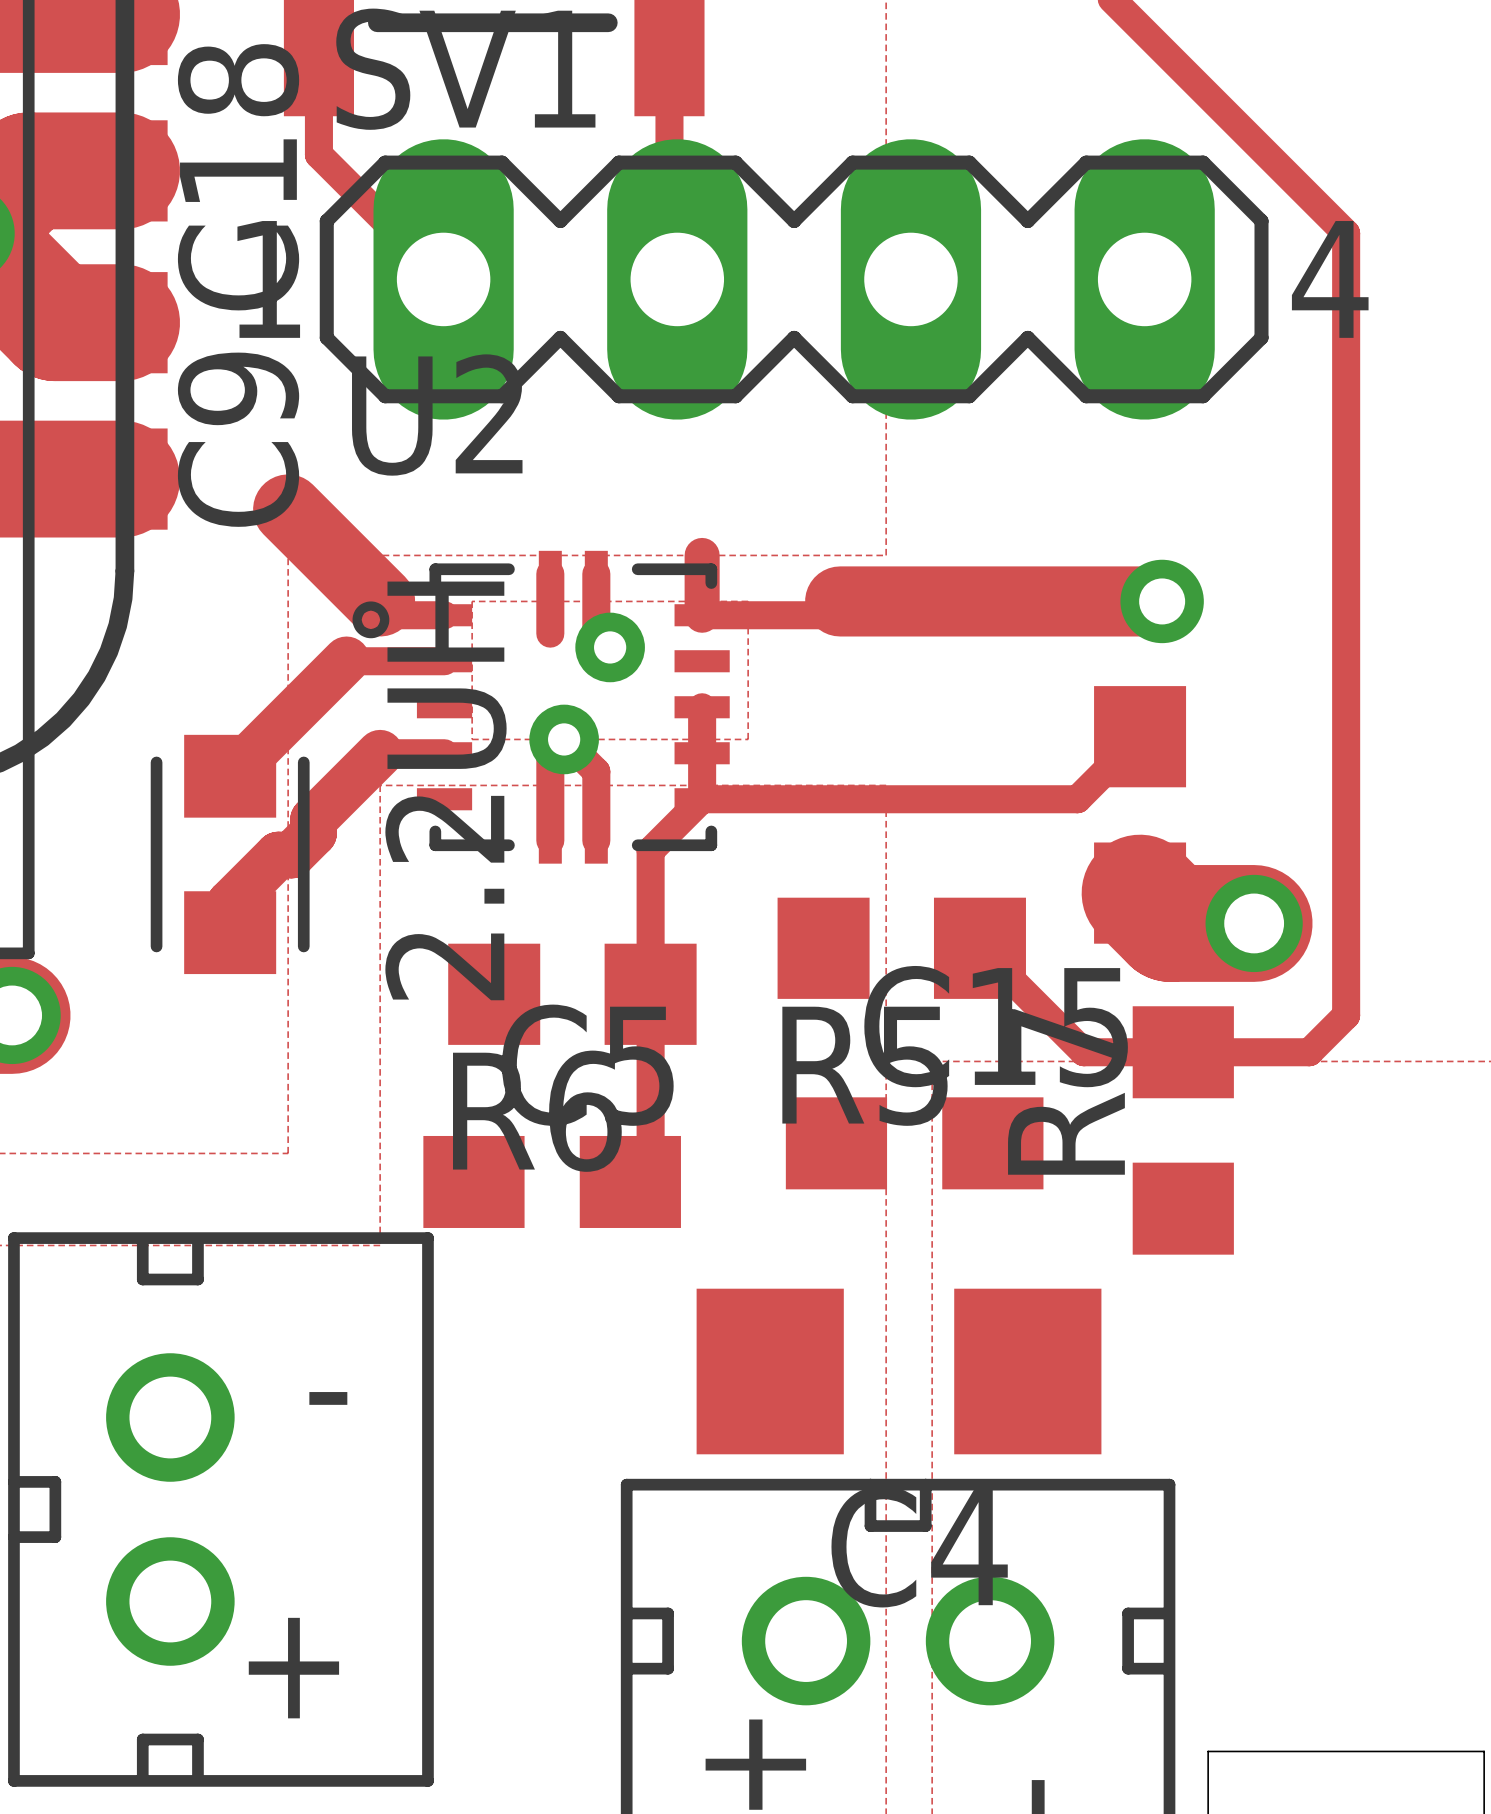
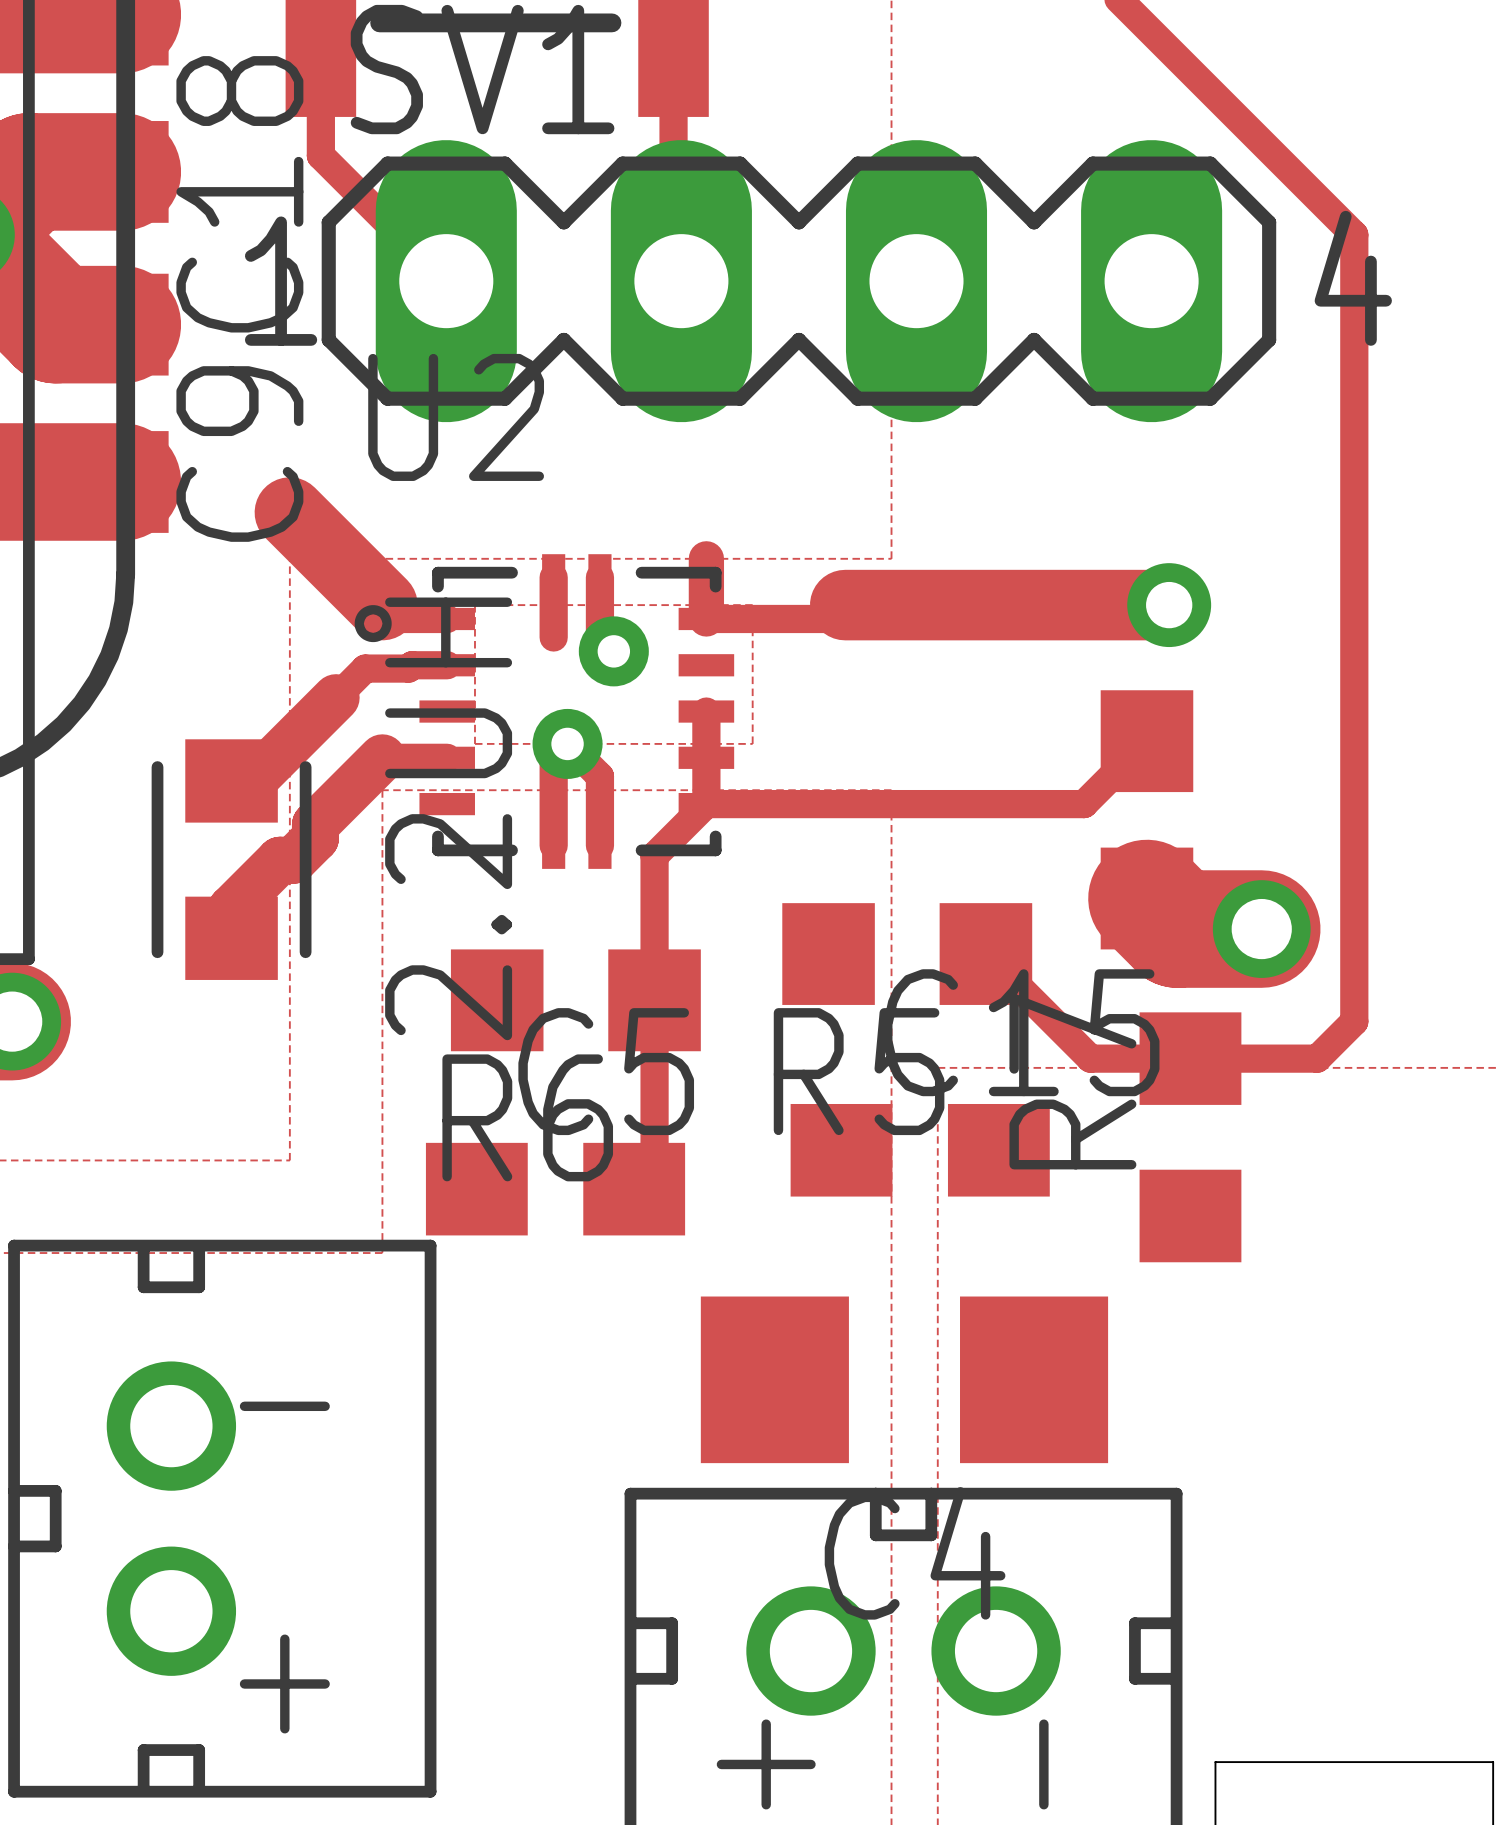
track: (409, 661) (346, 659) (230, 776) -> (412, 665) (408, 668) (365, 668) (252, 780) (231, 780)

